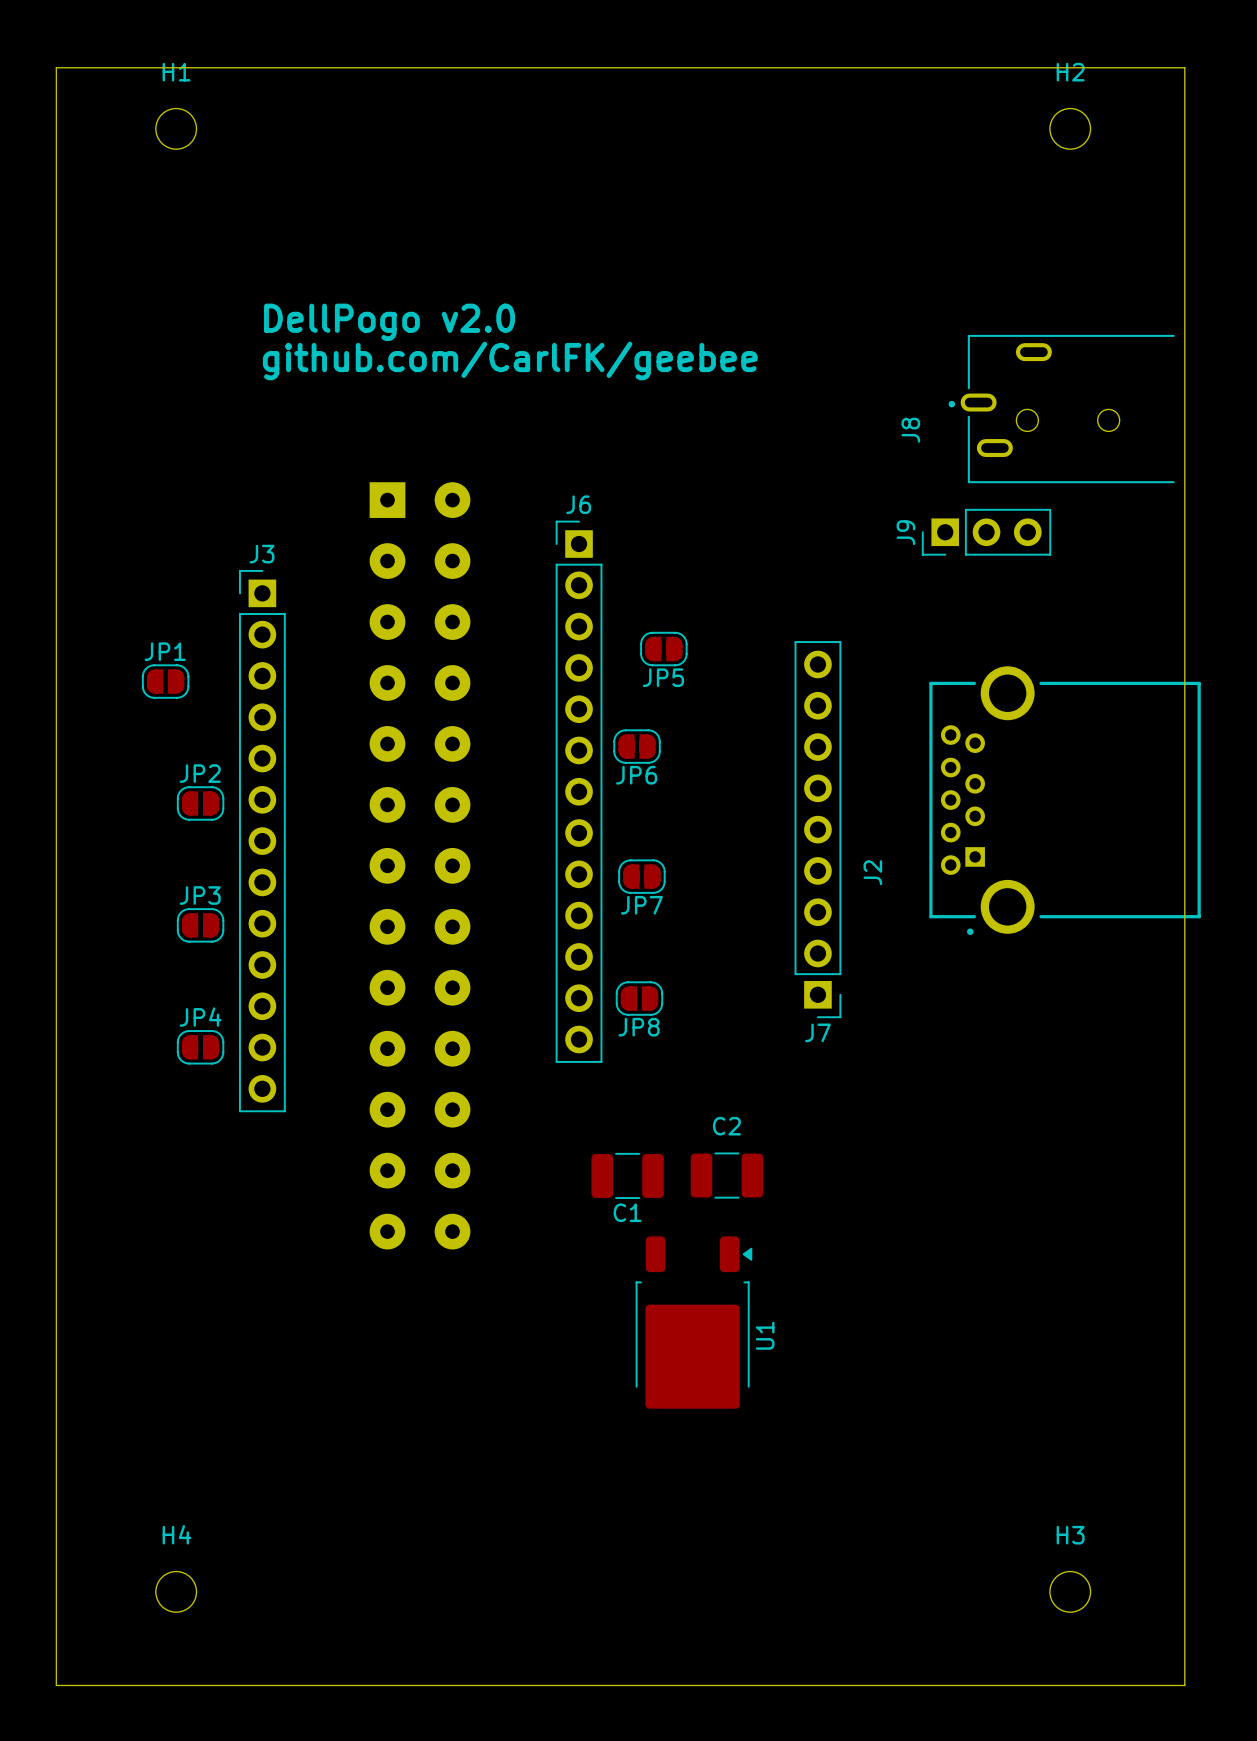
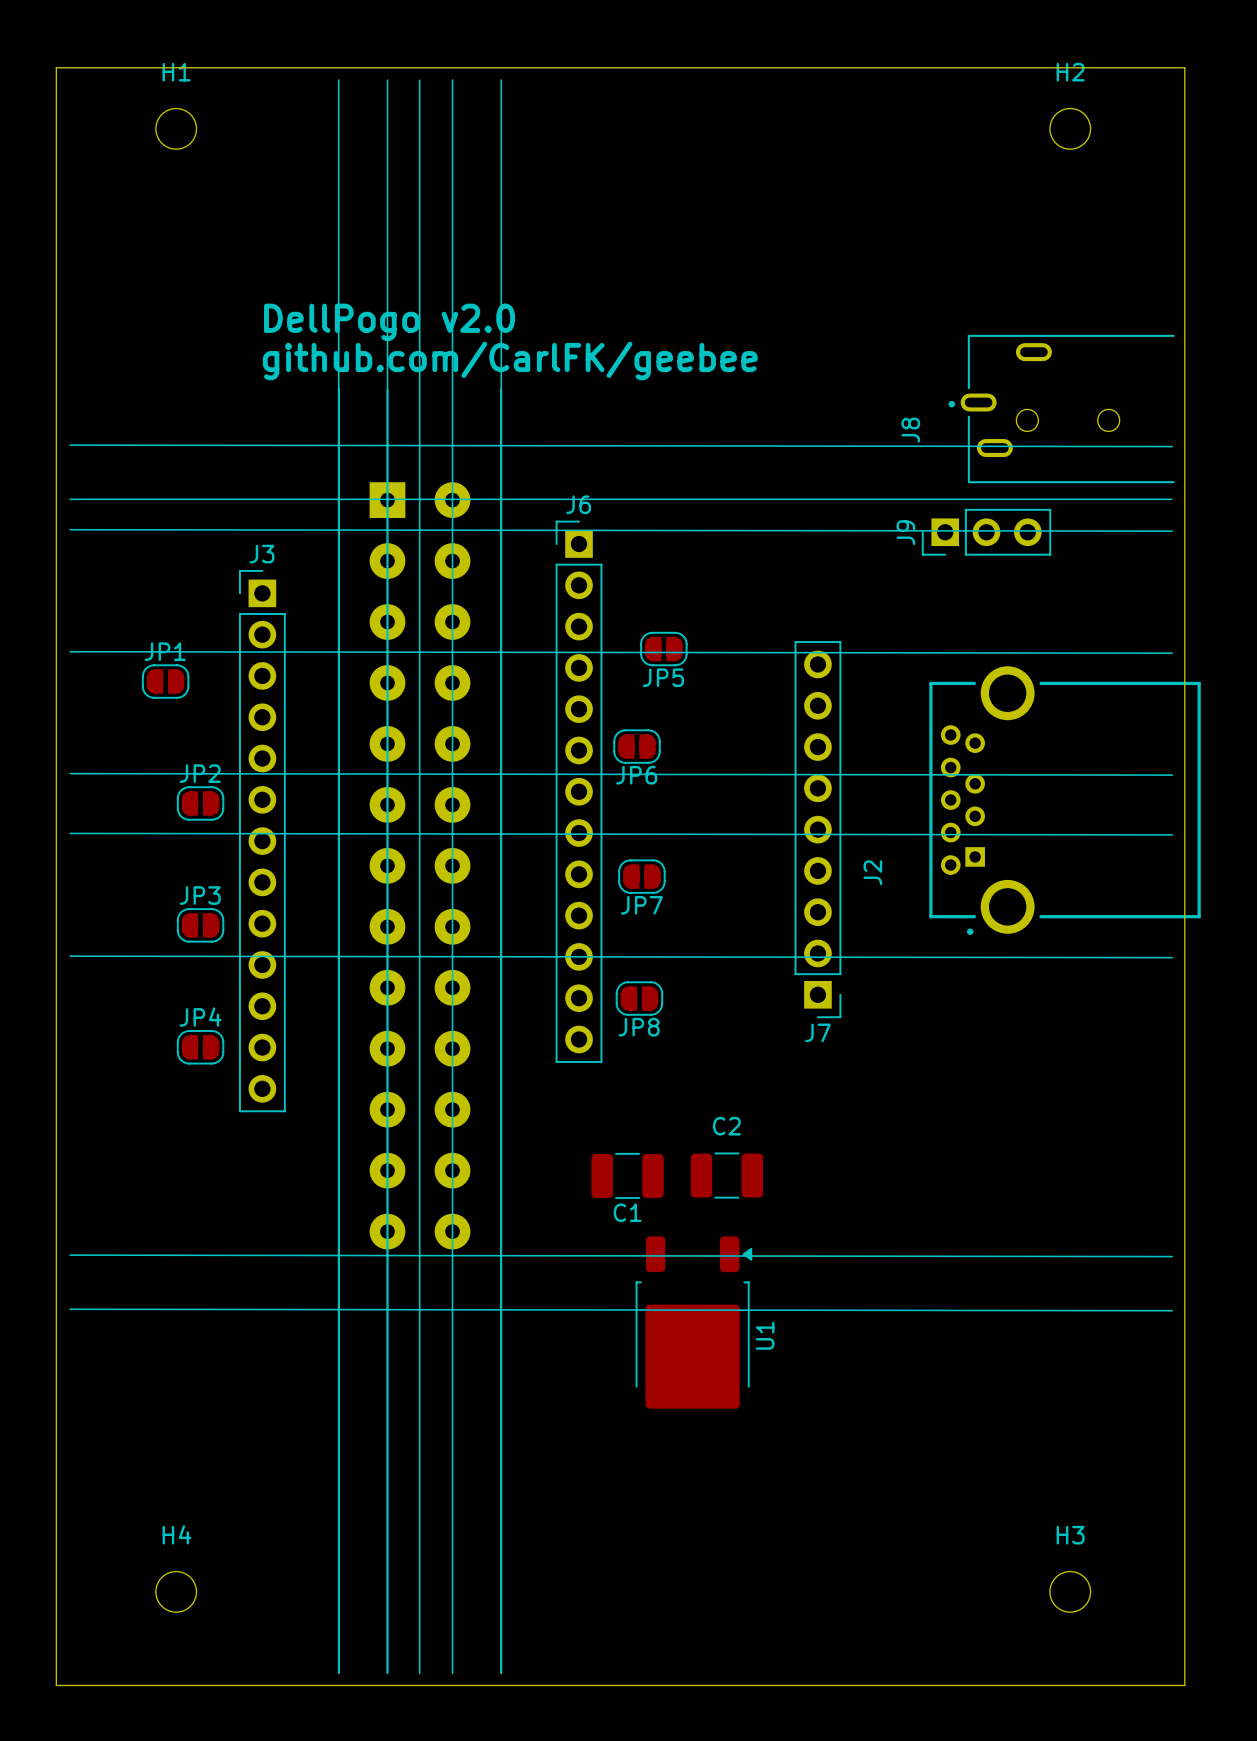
line: none -> (338, 80) (338, 1673)
line: none -> (387, 80) (387, 1673)
line: none -> (419, 80) (419, 1673)
line: none -> (452, 80) (452, 1673)
line: none -> (501, 80) (501, 1673)
line: none -> (70, 445) (1172, 446)
line: none -> (70, 499) (1171, 499)
line: none -> (70, 529) (1172, 531)
line: none -> (70, 651) (1172, 653)
line: none -> (70, 773) (1172, 775)
line: none -> (70, 833) (1172, 834)
line: none -> (70, 956) (1172, 957)
line: none -> (70, 1255) (1172, 1256)
line: none -> (70, 1309) (1172, 1310)

